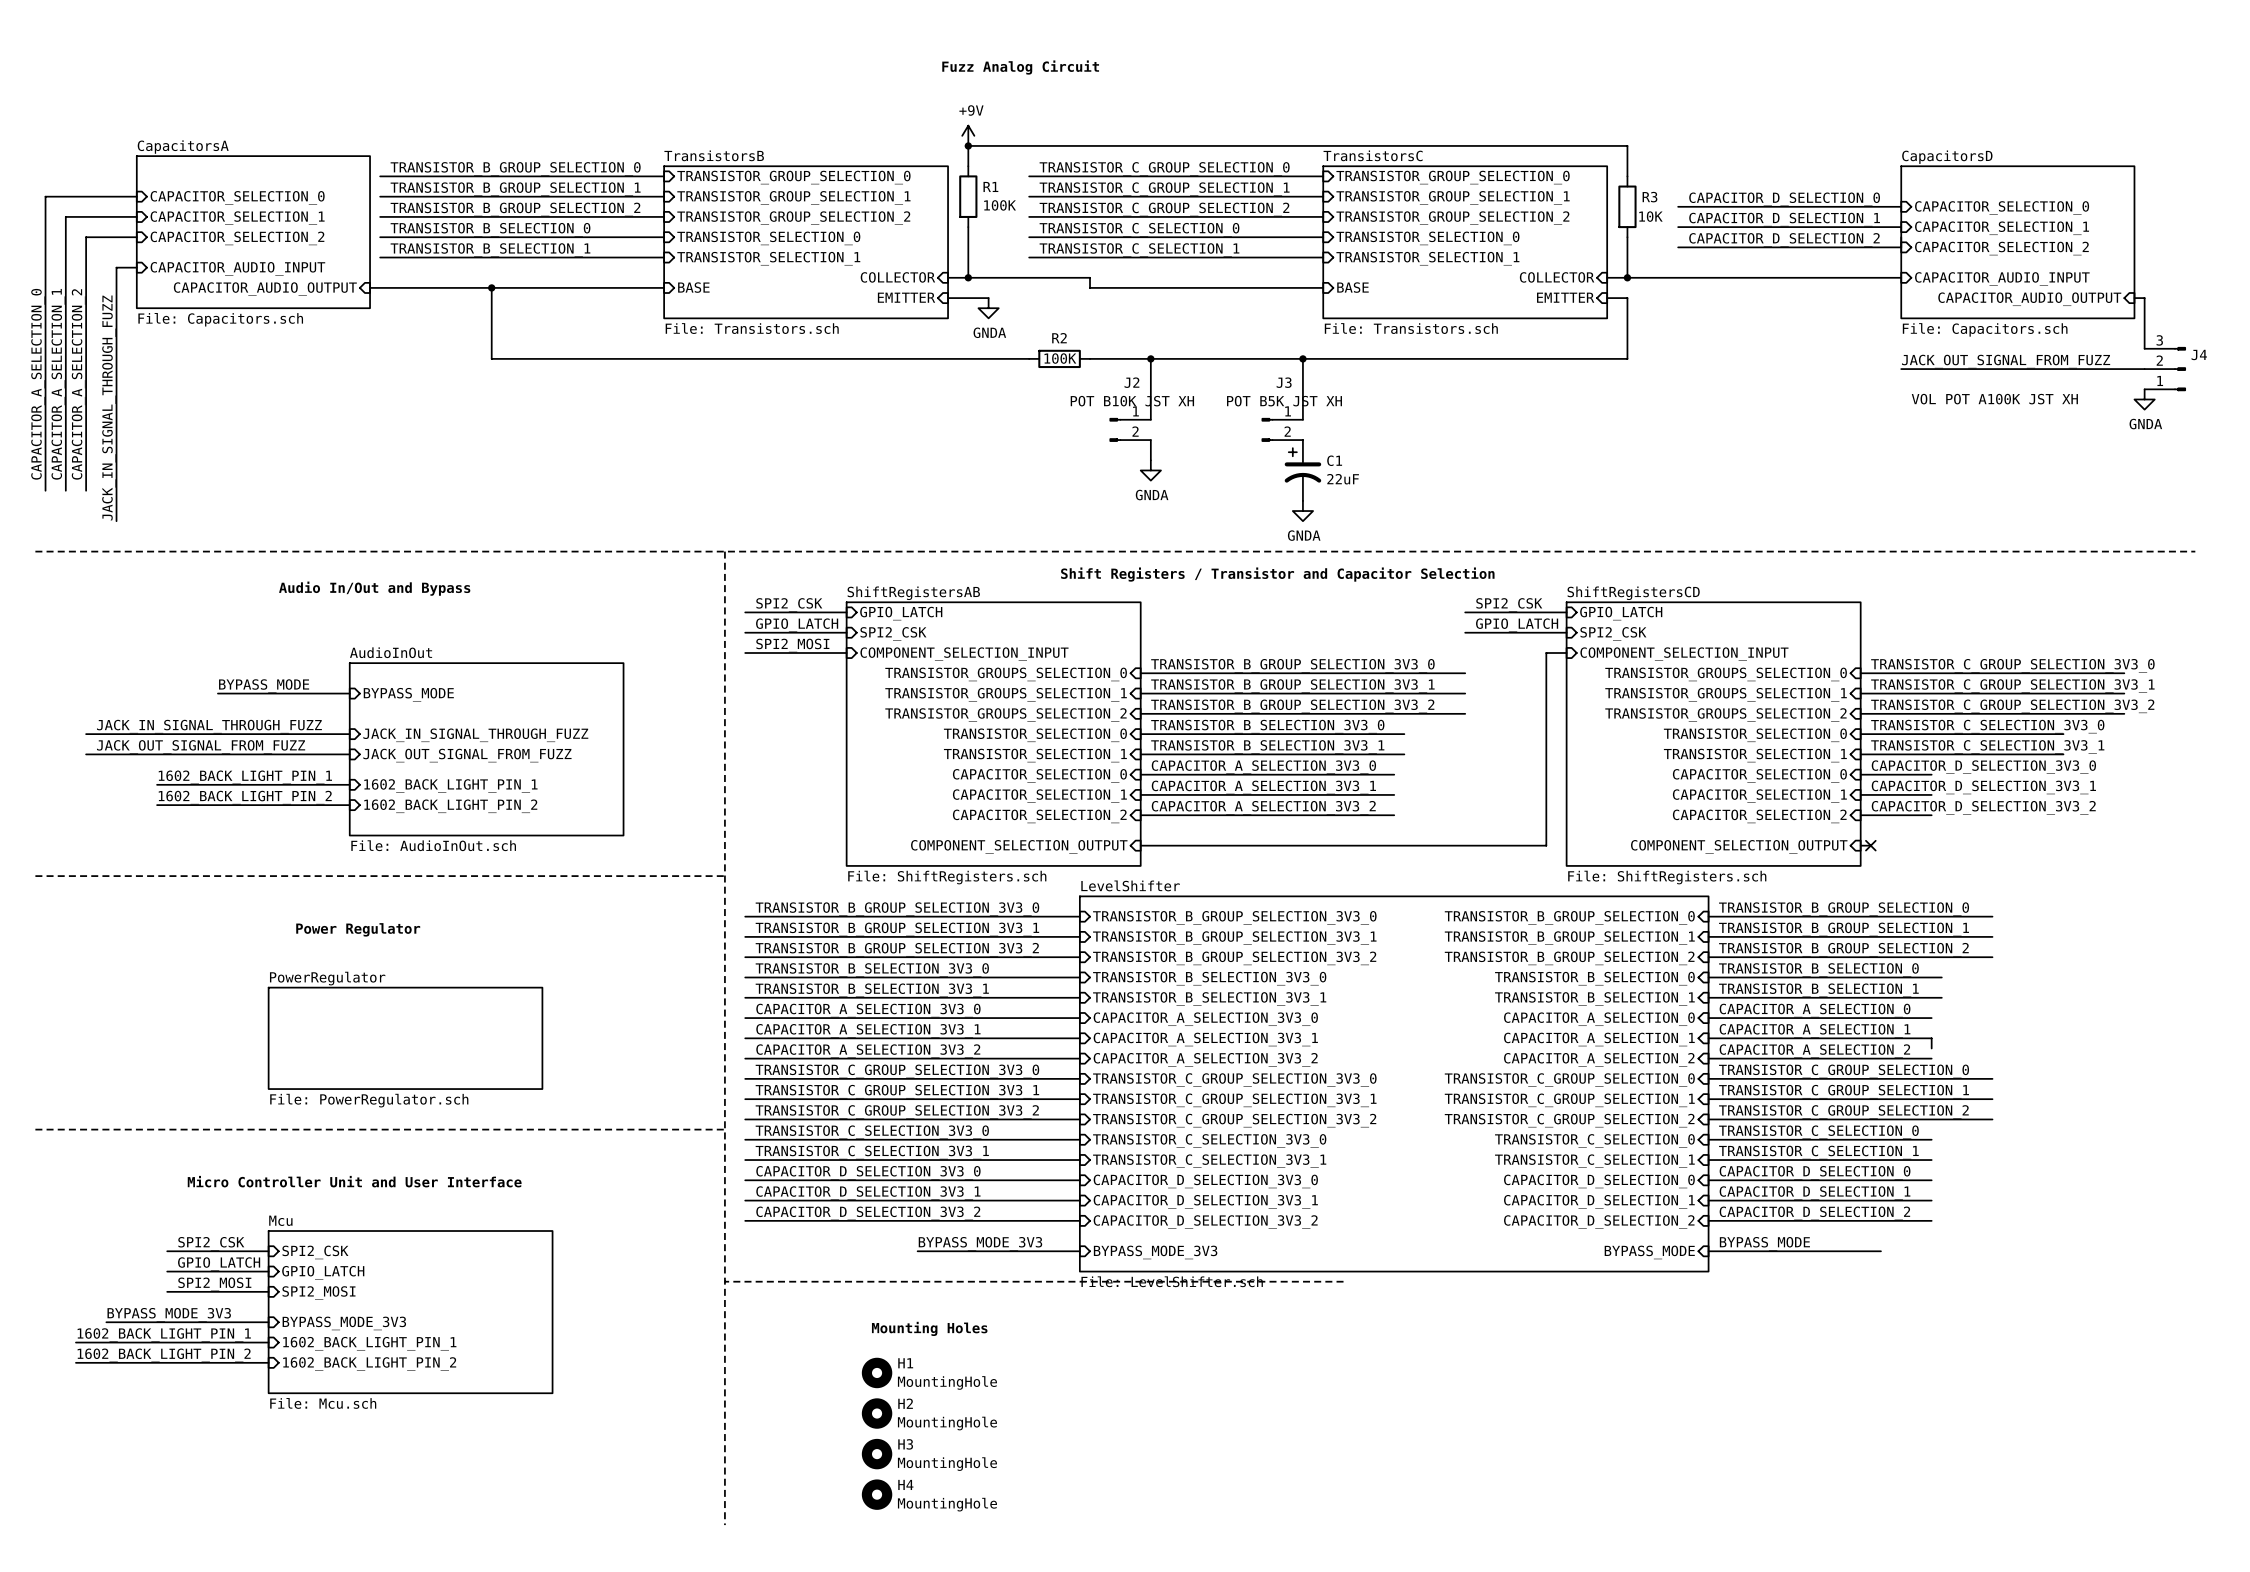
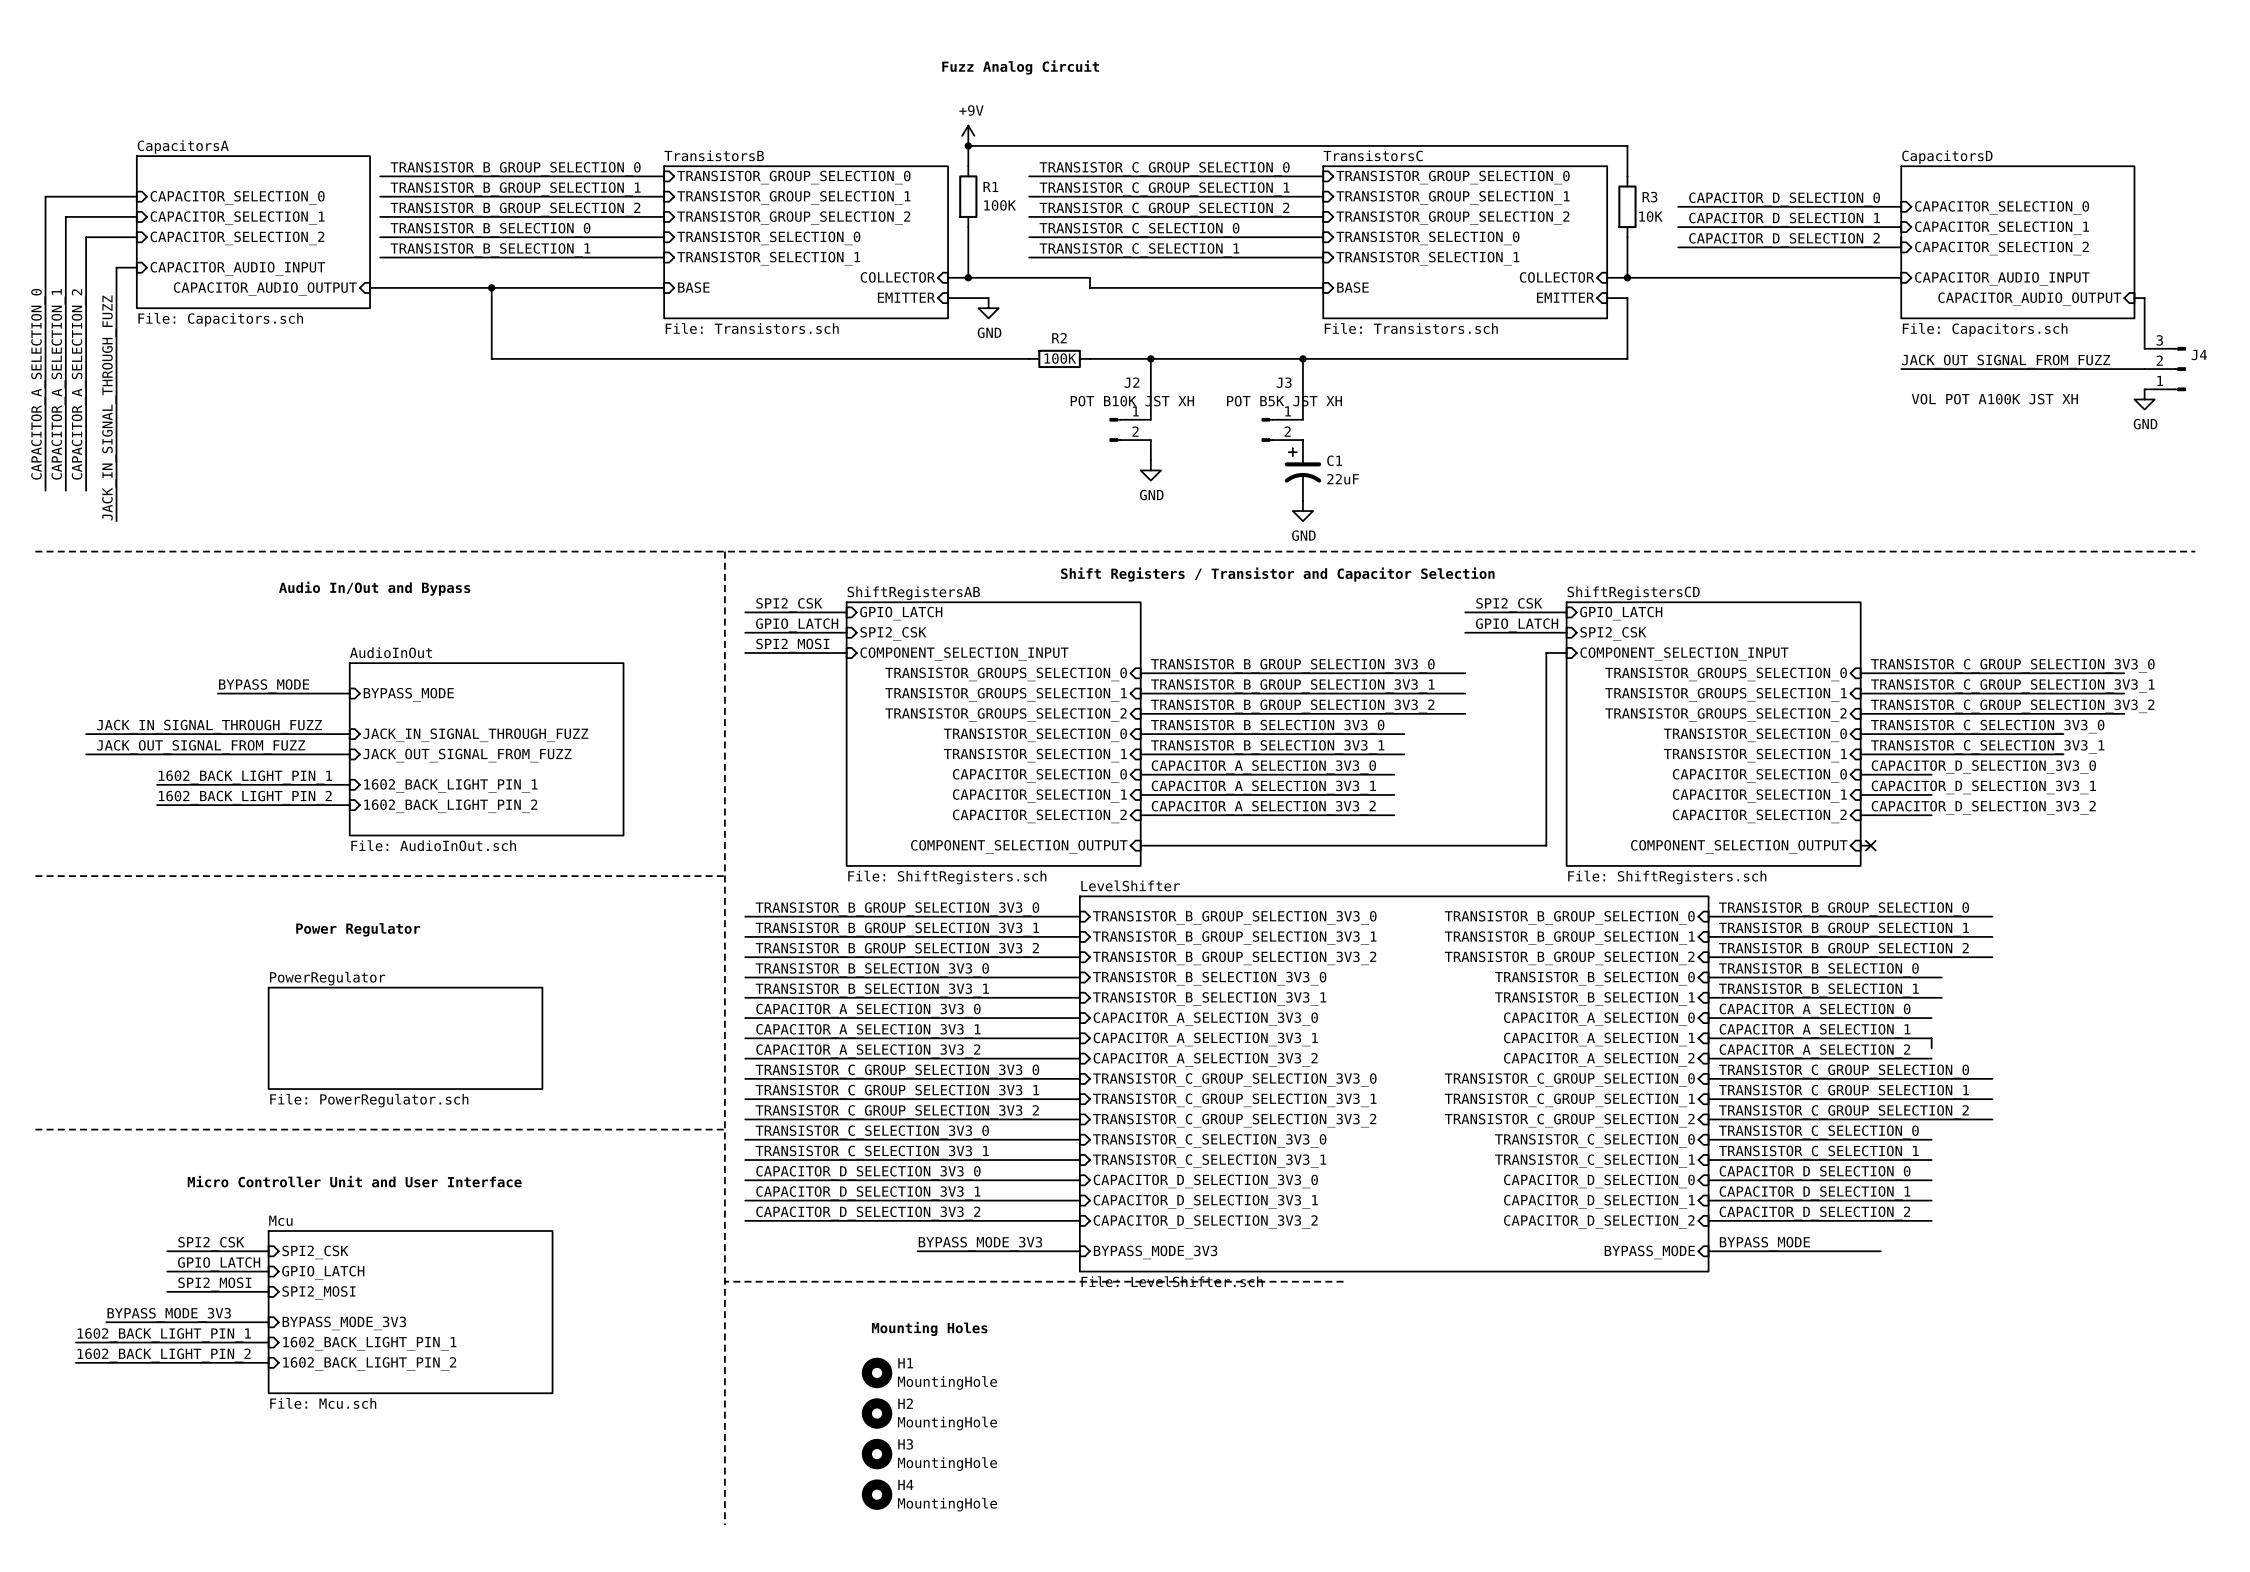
power symbol: GNDA (988, 308) -> GND (988, 308)
power symbol: GNDA (2144, 399) -> GND (2144, 399)
power symbol: GNDA (1150, 470) -> GND (1150, 470)
power symbol: GNDA (1302, 511) -> GND (1302, 511)

